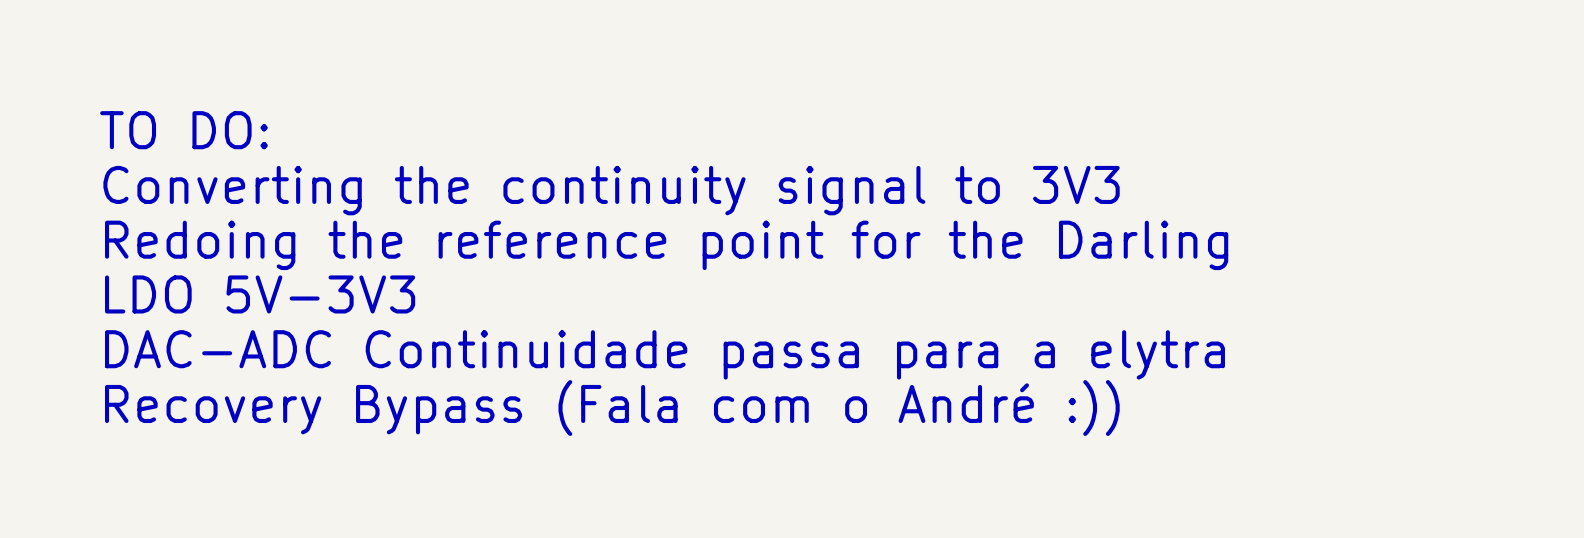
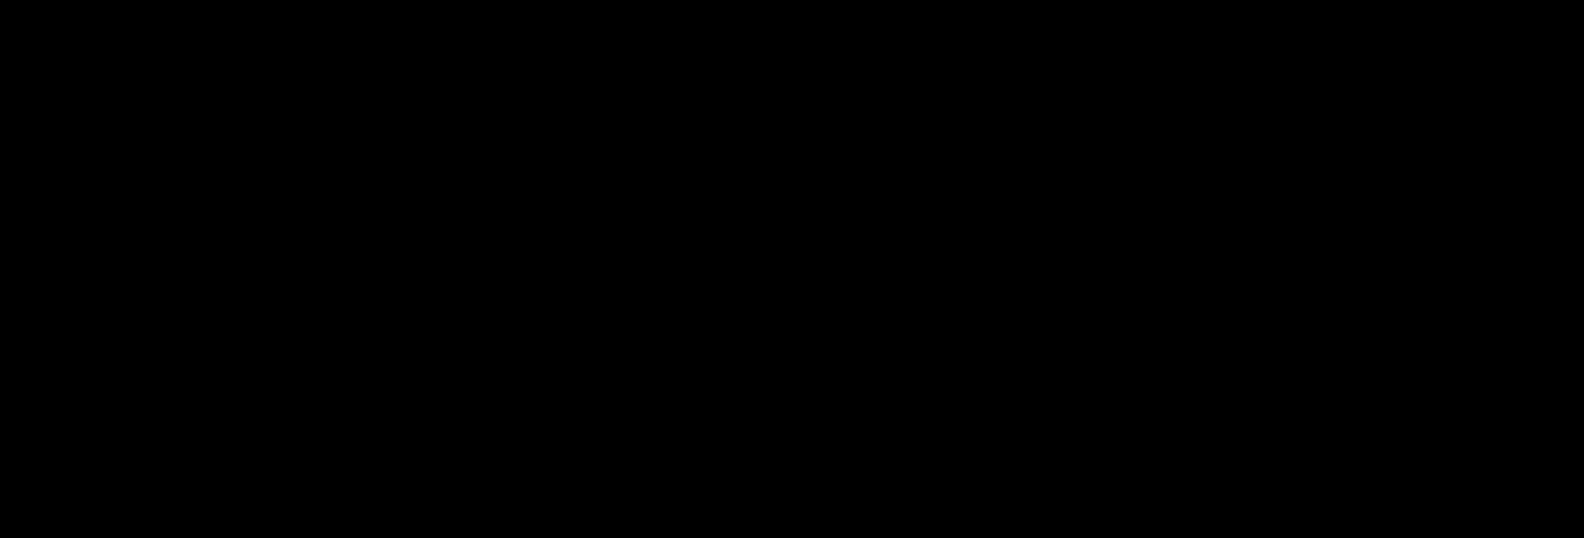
text: TO DO: (183, 130) -> none
text: Converting the continuity signal to 3V3 (611, 190) -> none
text: Redoing the reference point for the Darling (666, 245) -> none
text: LDO 5V-3V3 (260, 294) -> none
text: DAC-ADC Continuidade passa para a elytra (664, 354) -> none
text: Recovery Bypass (Fala com o André :)) (612, 408) -> none

